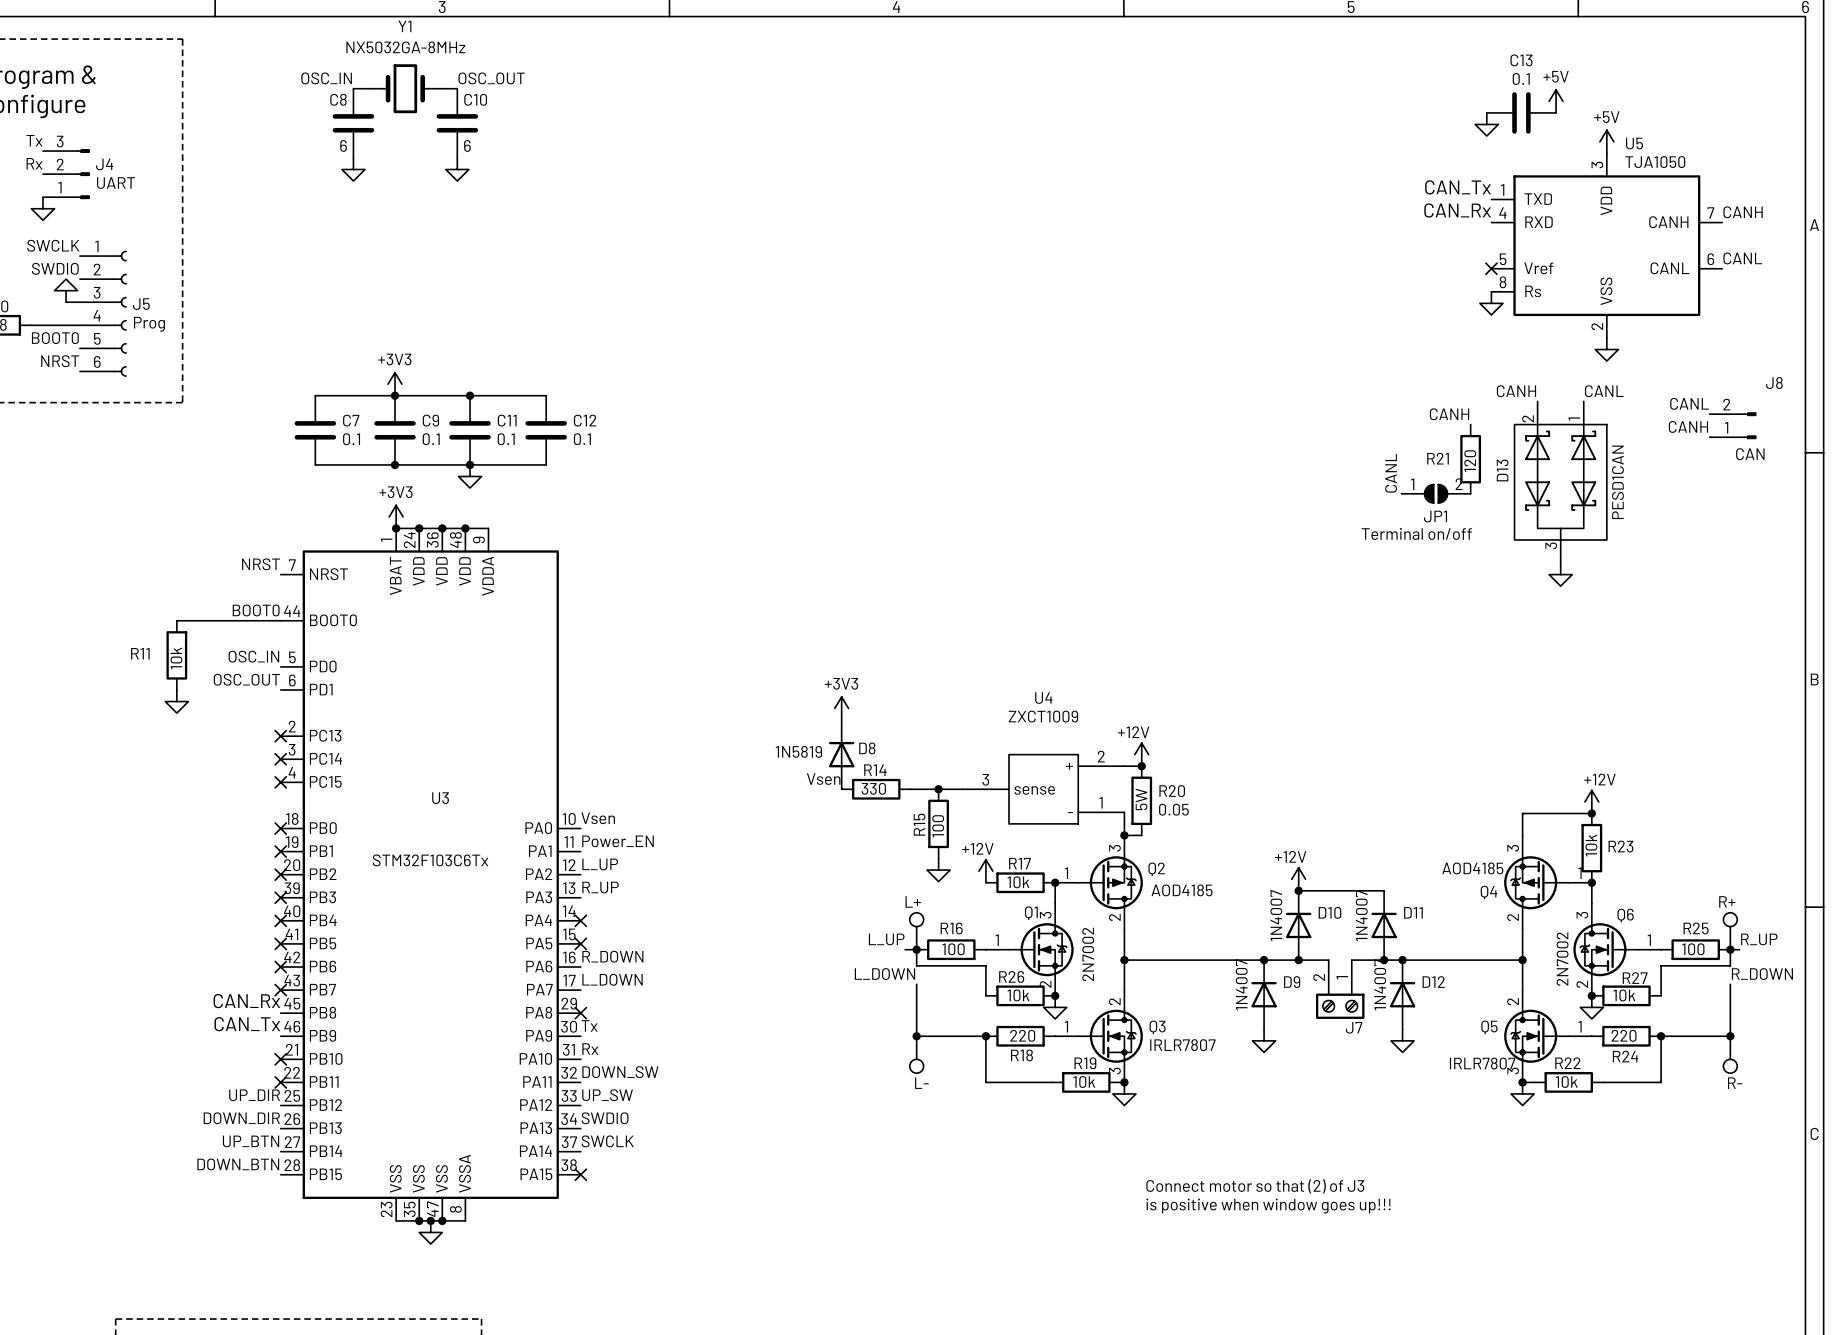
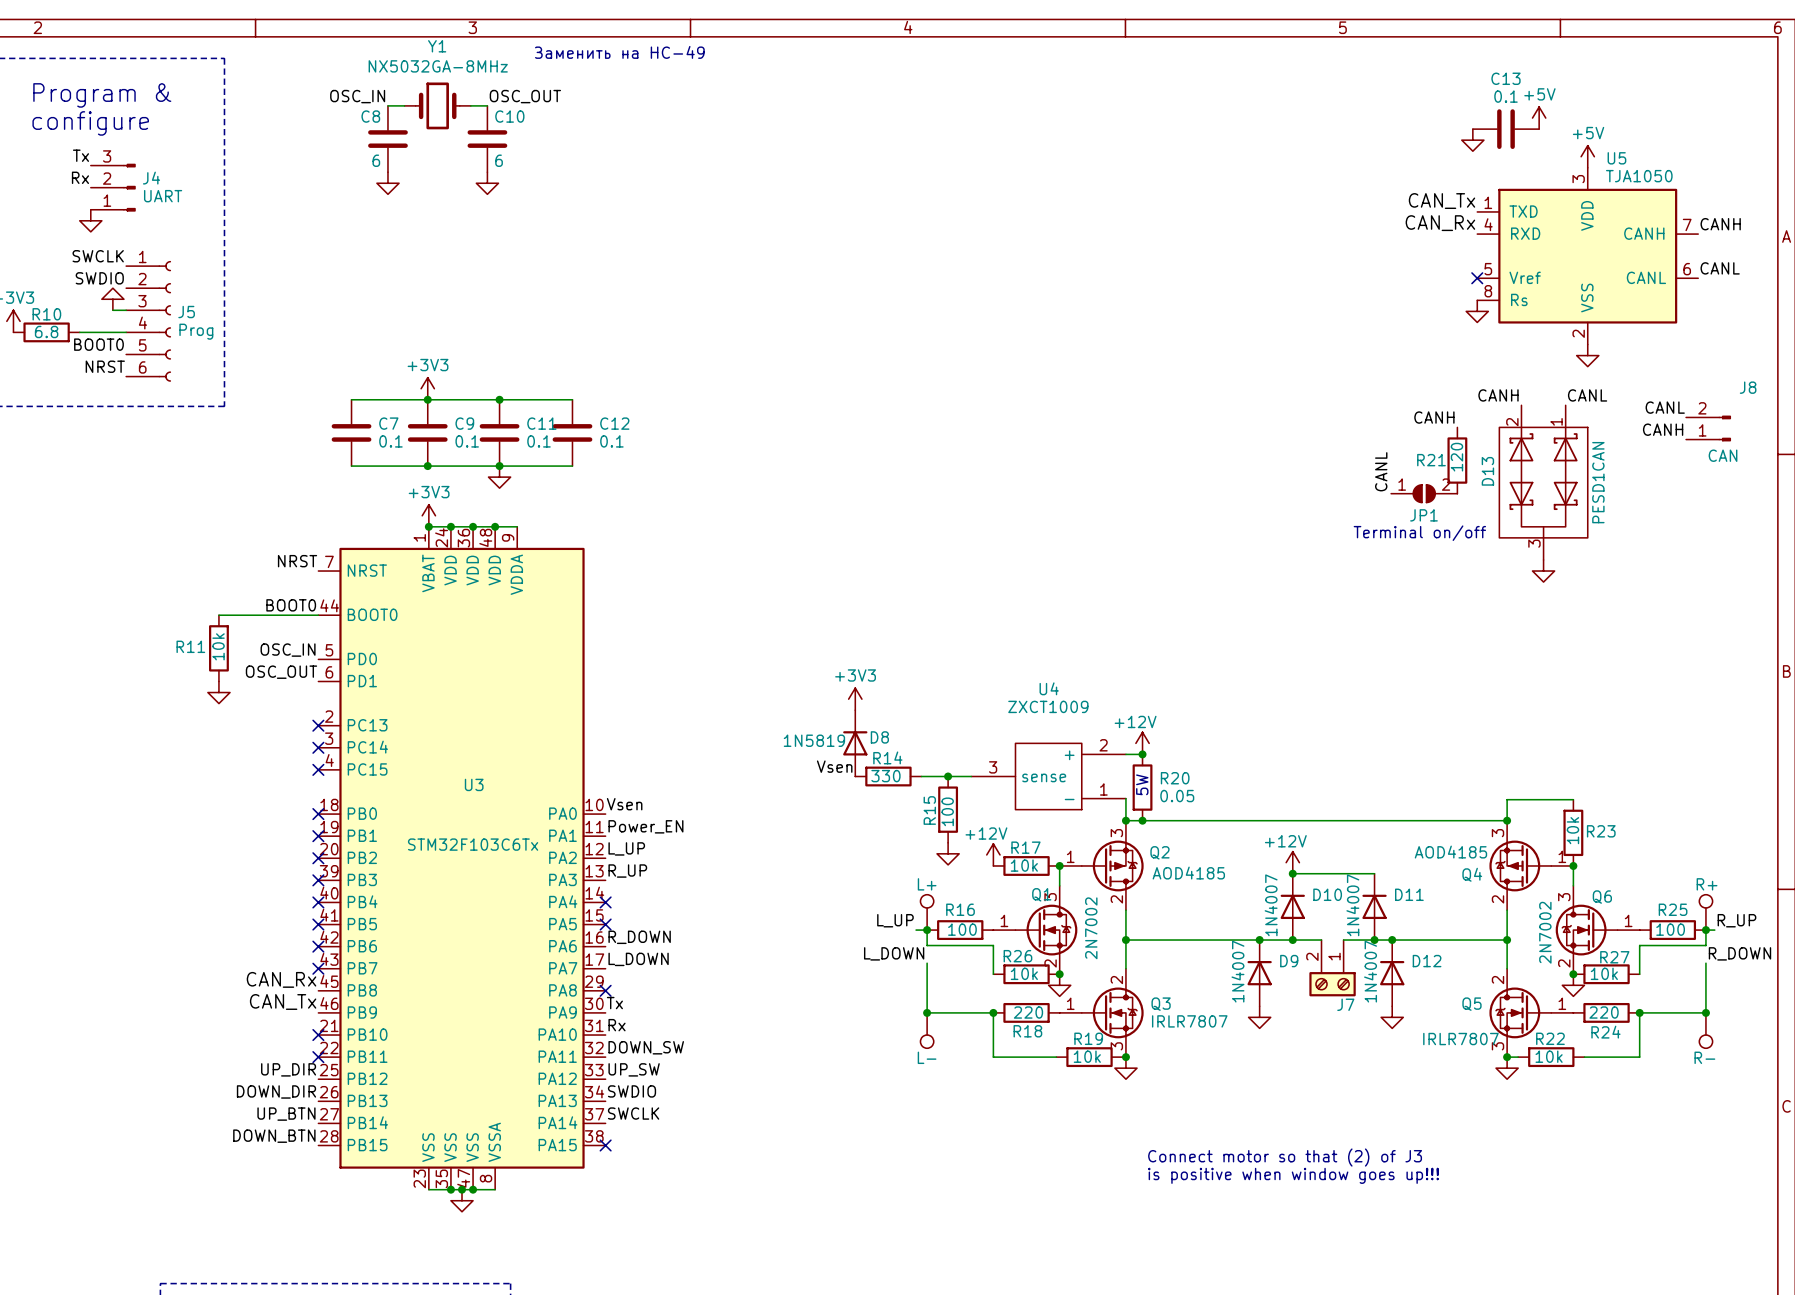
text: none -> Заменить на HC-49 (619, 52)
power symbol: +12V (1591, 801) -> none
junction: (1591, 813) -> none
wire: none -> (1142, 820) (1507, 820)
junction: none -> (1142, 820)
junction: none -> (1507, 820)

